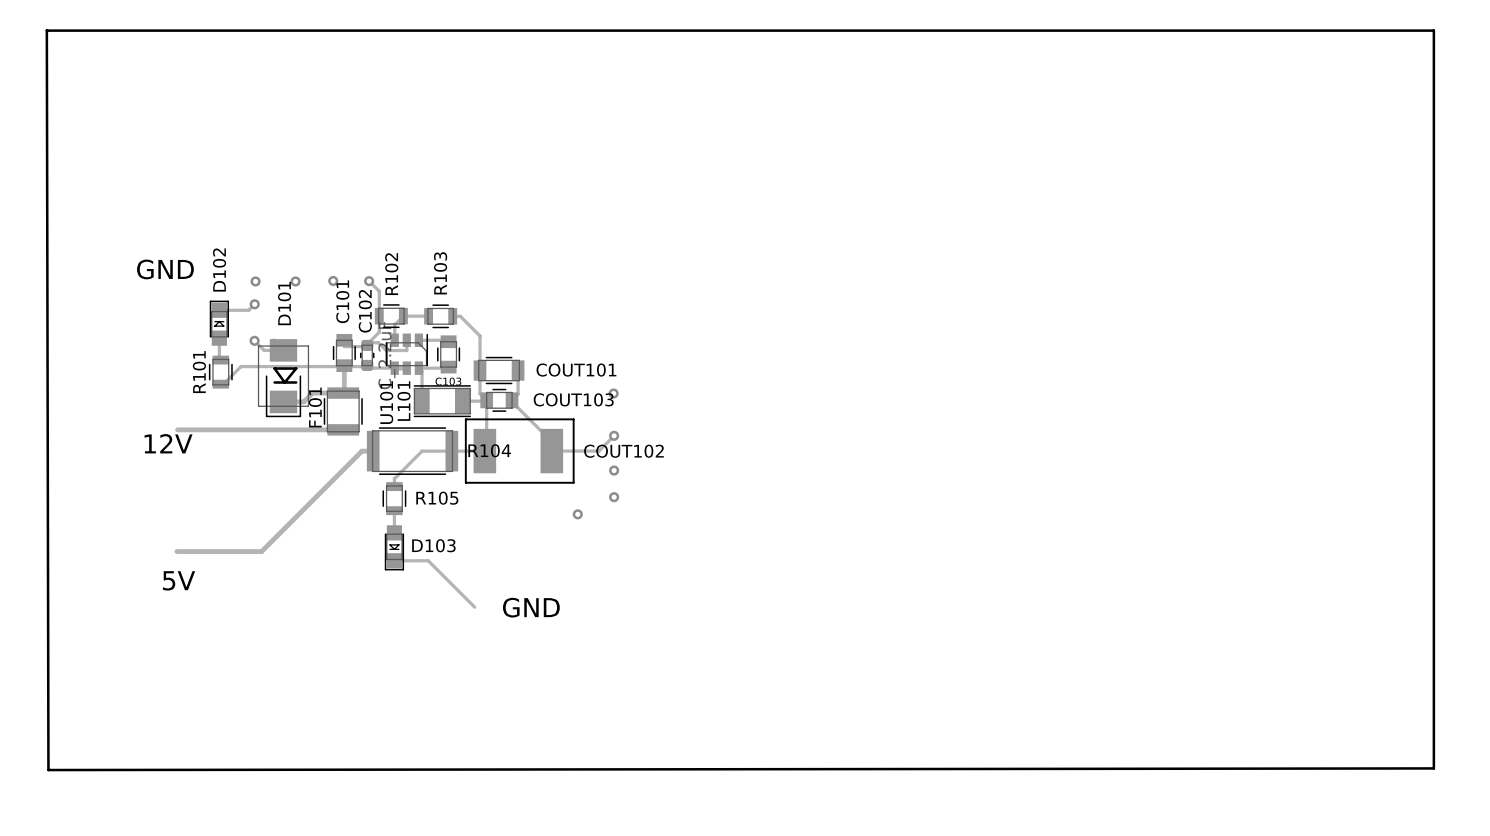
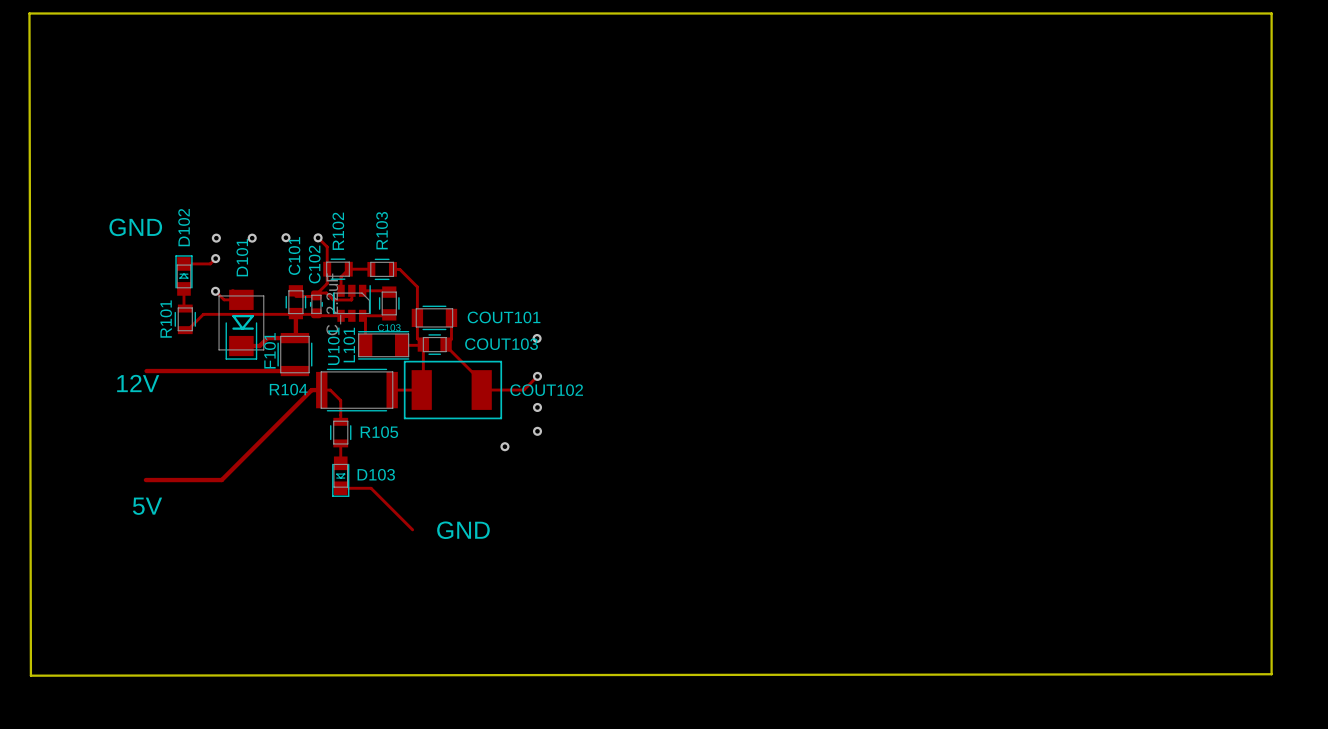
R104 name position: R104 (489, 450) -> R104 (288, 389)
track: (451, 451) (422, 451) (394, 478) -> (321, 390) (330, 390) (340, 400) (340, 414)

